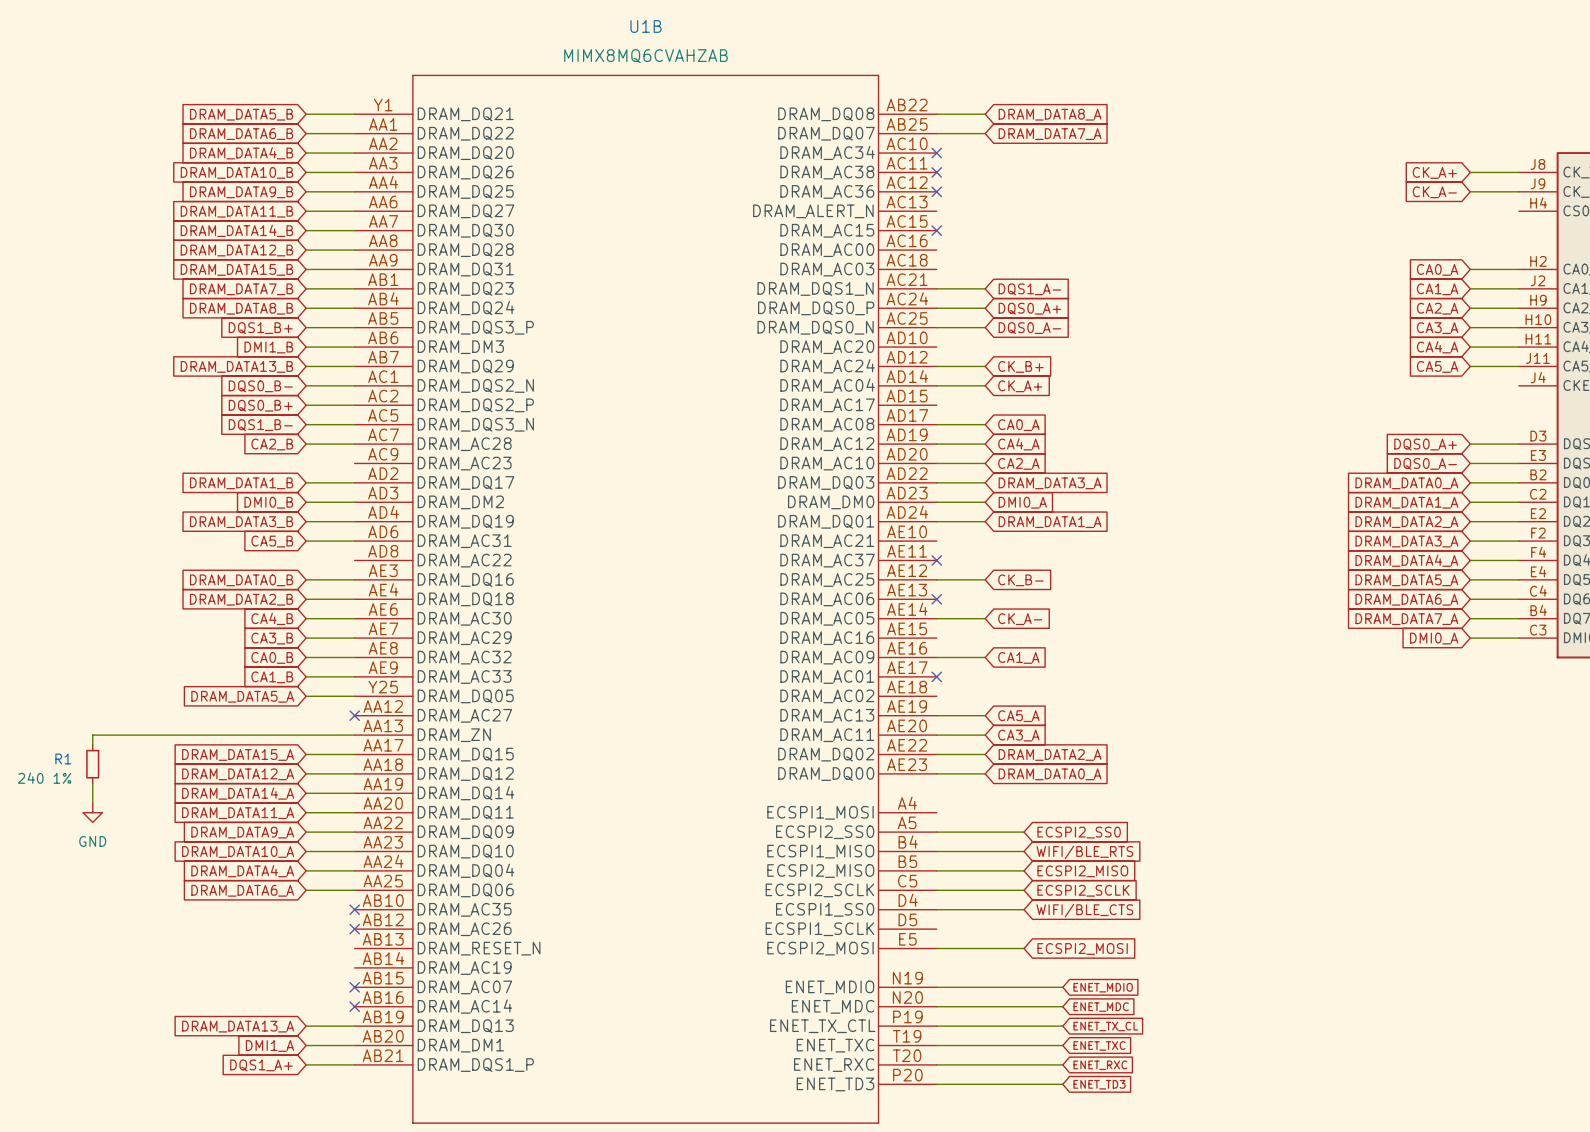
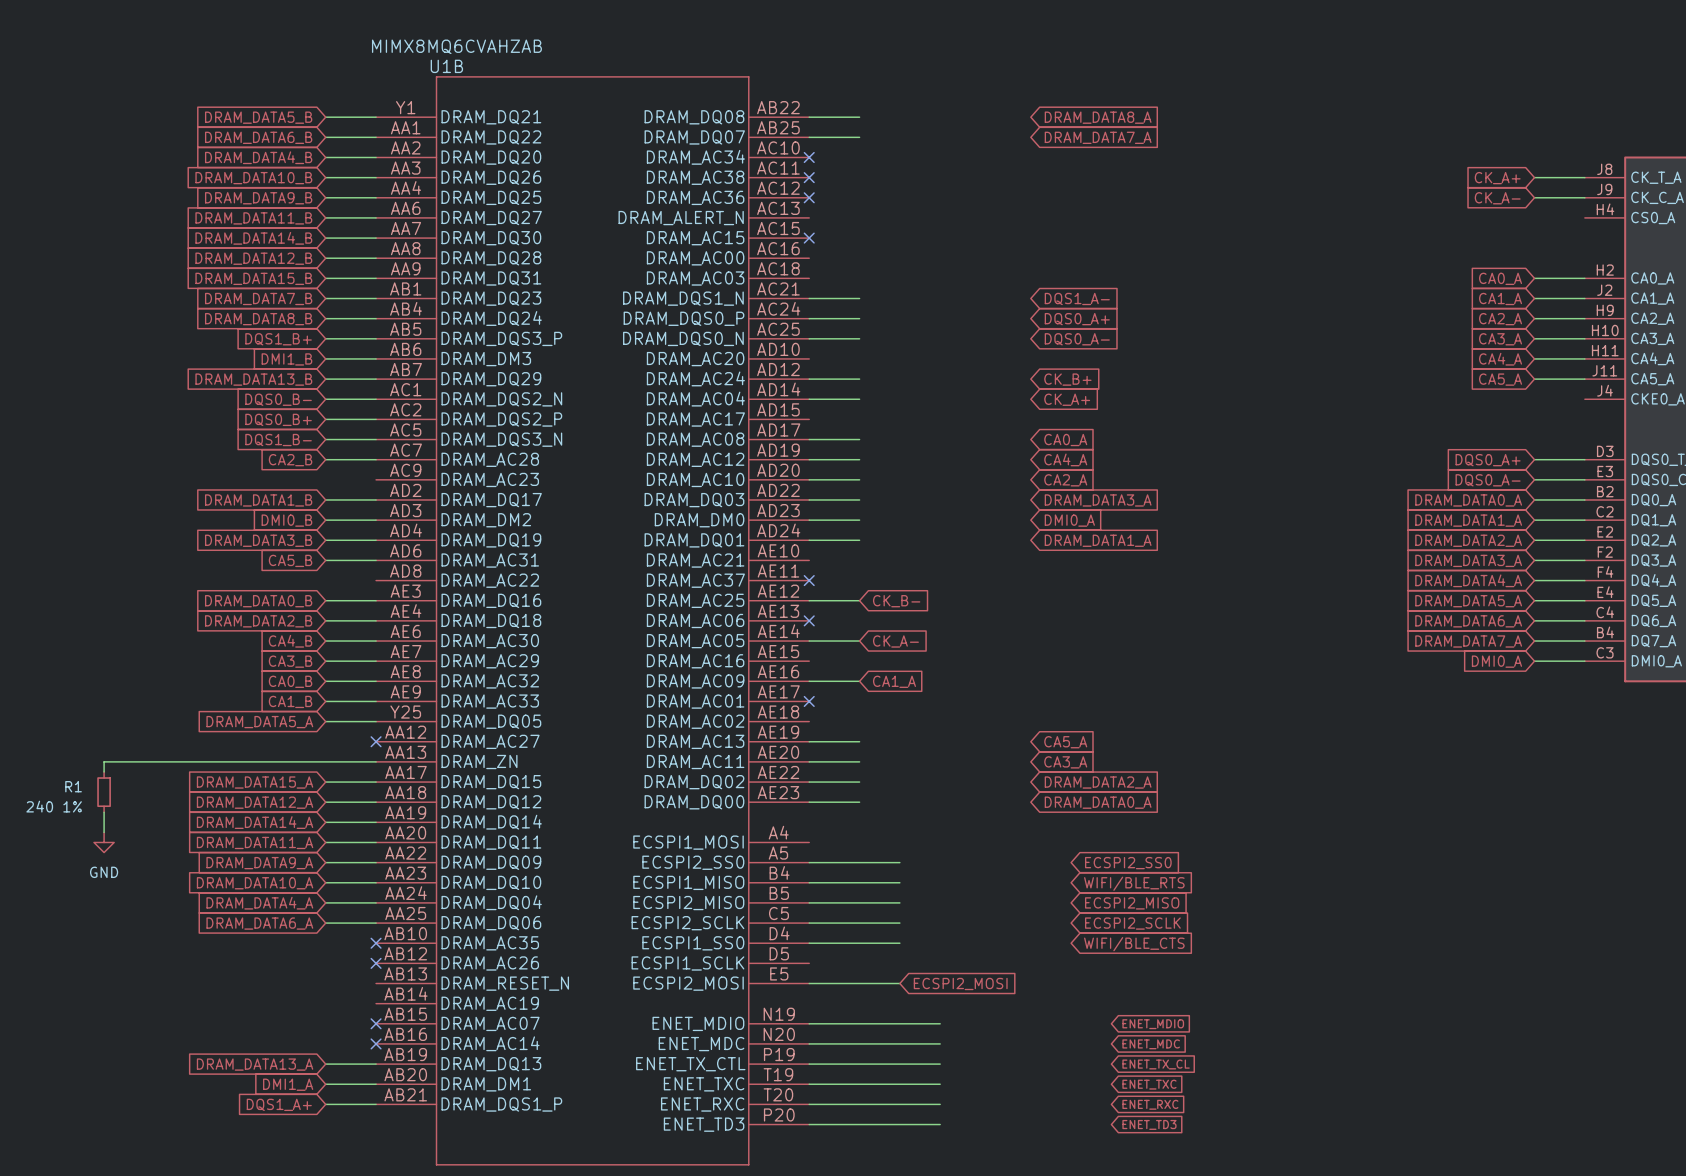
U1B name position: U1B (645, 26) -> U1B (446, 66)
U1B value position: MIMX8MQ6CVAHZAB (645, 56) -> MIMX8MQ6CVAHZAB (456, 46)
U1B symbol: [354, 74, 937, 1124] -> [376, 76, 810, 1166]
wire: (936, 114) (985, 114) -> (809, 117) (859, 117)
wire: (936, 133) (985, 133) -> (809, 137) (859, 137)
no-connect mark: none -> (809, 157)
no-connect mark: (936, 153) -> none
no-connect mark: none -> (809, 177)
no-connect mark: (936, 172) -> none
no-connect mark: none -> (809, 197)
no-connect mark: (936, 191) -> none
no-connect mark: none -> (809, 238)
no-connect mark: (936, 230) -> none
wire: (936, 288) (985, 288) -> (809, 298) (859, 298)
wire: (936, 308) (985, 308) -> (809, 318) (859, 318)
wire: (936, 327) (985, 327) -> (809, 338) (859, 338)
wire: (936, 366) (985, 366) -> (809, 379) (859, 379)
wire: (936, 385) (985, 385) -> (809, 399) (859, 399)
wire: (936, 424) (985, 424) -> (809, 439) (859, 439)
wire: (936, 444) (985, 444) -> (809, 459) (859, 459)
wire: (936, 463) (985, 463) -> (809, 479) (859, 479)
wire: (936, 482) (985, 482) -> (809, 499) (859, 499)
wire: (936, 502) (985, 502) -> (809, 520) (859, 520)
wire: (936, 521) (985, 521) -> (809, 540) (859, 540)
no-connect mark: none -> (809, 580)
no-connect mark: (936, 560) -> none
wire: (936, 579) (985, 579) -> (809, 600) (859, 600)
global label position: CK_B- (1020, 580) -> CK_B- (896, 601)
no-connect mark: none -> (809, 620)
no-connect mark: (936, 599) -> none
wire: (936, 618) (985, 618) -> (809, 641) (859, 641)
global label position: CK_A- (1020, 619) -> CK_A- (895, 641)
wire: (936, 657) (985, 657) -> (809, 681) (859, 681)
global label position: CA1_A (1018, 657) -> CA1_A (894, 681)
no-connect mark: none -> (809, 701)
no-connect mark: (936, 676) -> none
wire: (936, 715) (985, 715) -> (809, 741) (859, 741)
wire: (936, 735) (985, 735) -> (809, 761) (859, 761)
wire: (936, 754) (985, 754) -> (809, 782) (859, 782)
wire: (936, 773) (985, 773) -> (809, 802) (859, 802)
wire: (936, 832) (1024, 832) -> (809, 862) (899, 862)
wire: (936, 851) (1024, 851) -> (809, 882) (899, 882)
wire: (936, 870) (1024, 870) -> (809, 902) (899, 902)
wire: (936, 890) (1024, 890) -> (809, 923) (899, 923)
wire: (936, 909) (1024, 909) -> (809, 943) (899, 943)
wire: (936, 948) (1024, 948) -> (809, 983) (899, 983)
global label position: ECSPI2_MOSI (1082, 948) -> ECSPI2_MOSI (960, 983)
wire: (936, 987) (1062, 987) -> (809, 1023) (940, 1023)
wire: (936, 1006) (1062, 1006) -> (809, 1043) (940, 1043)
wire: (936, 1026) (1062, 1026) -> (809, 1064) (940, 1064)
wire: (936, 1045) (1062, 1045) -> (809, 1084) (940, 1084)
wire: (936, 1064) (1062, 1064) -> (809, 1104) (940, 1104)
wire: (936, 1084) (1062, 1084) -> (809, 1124) (940, 1124)

